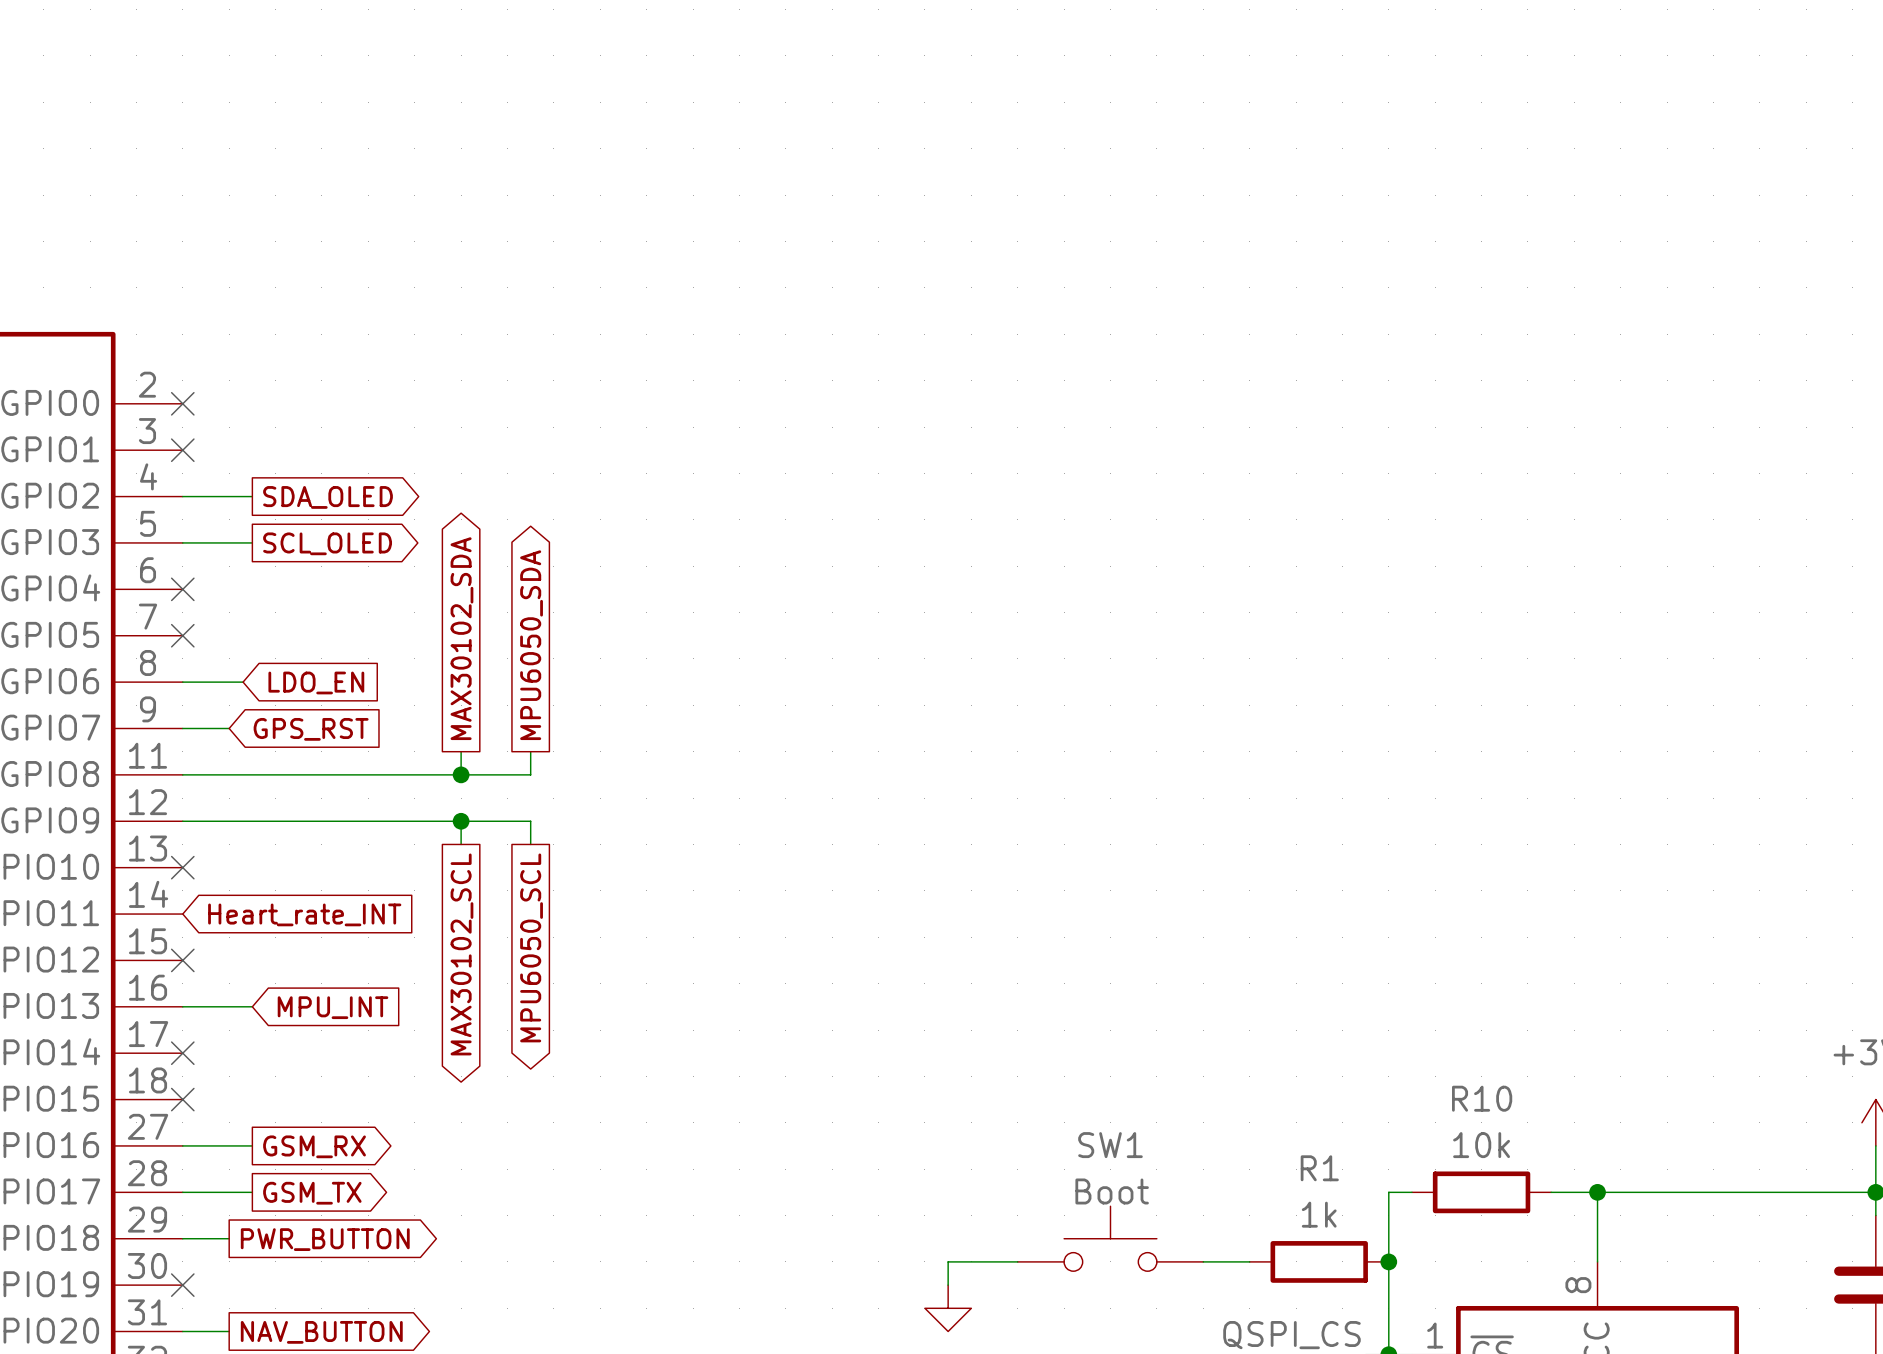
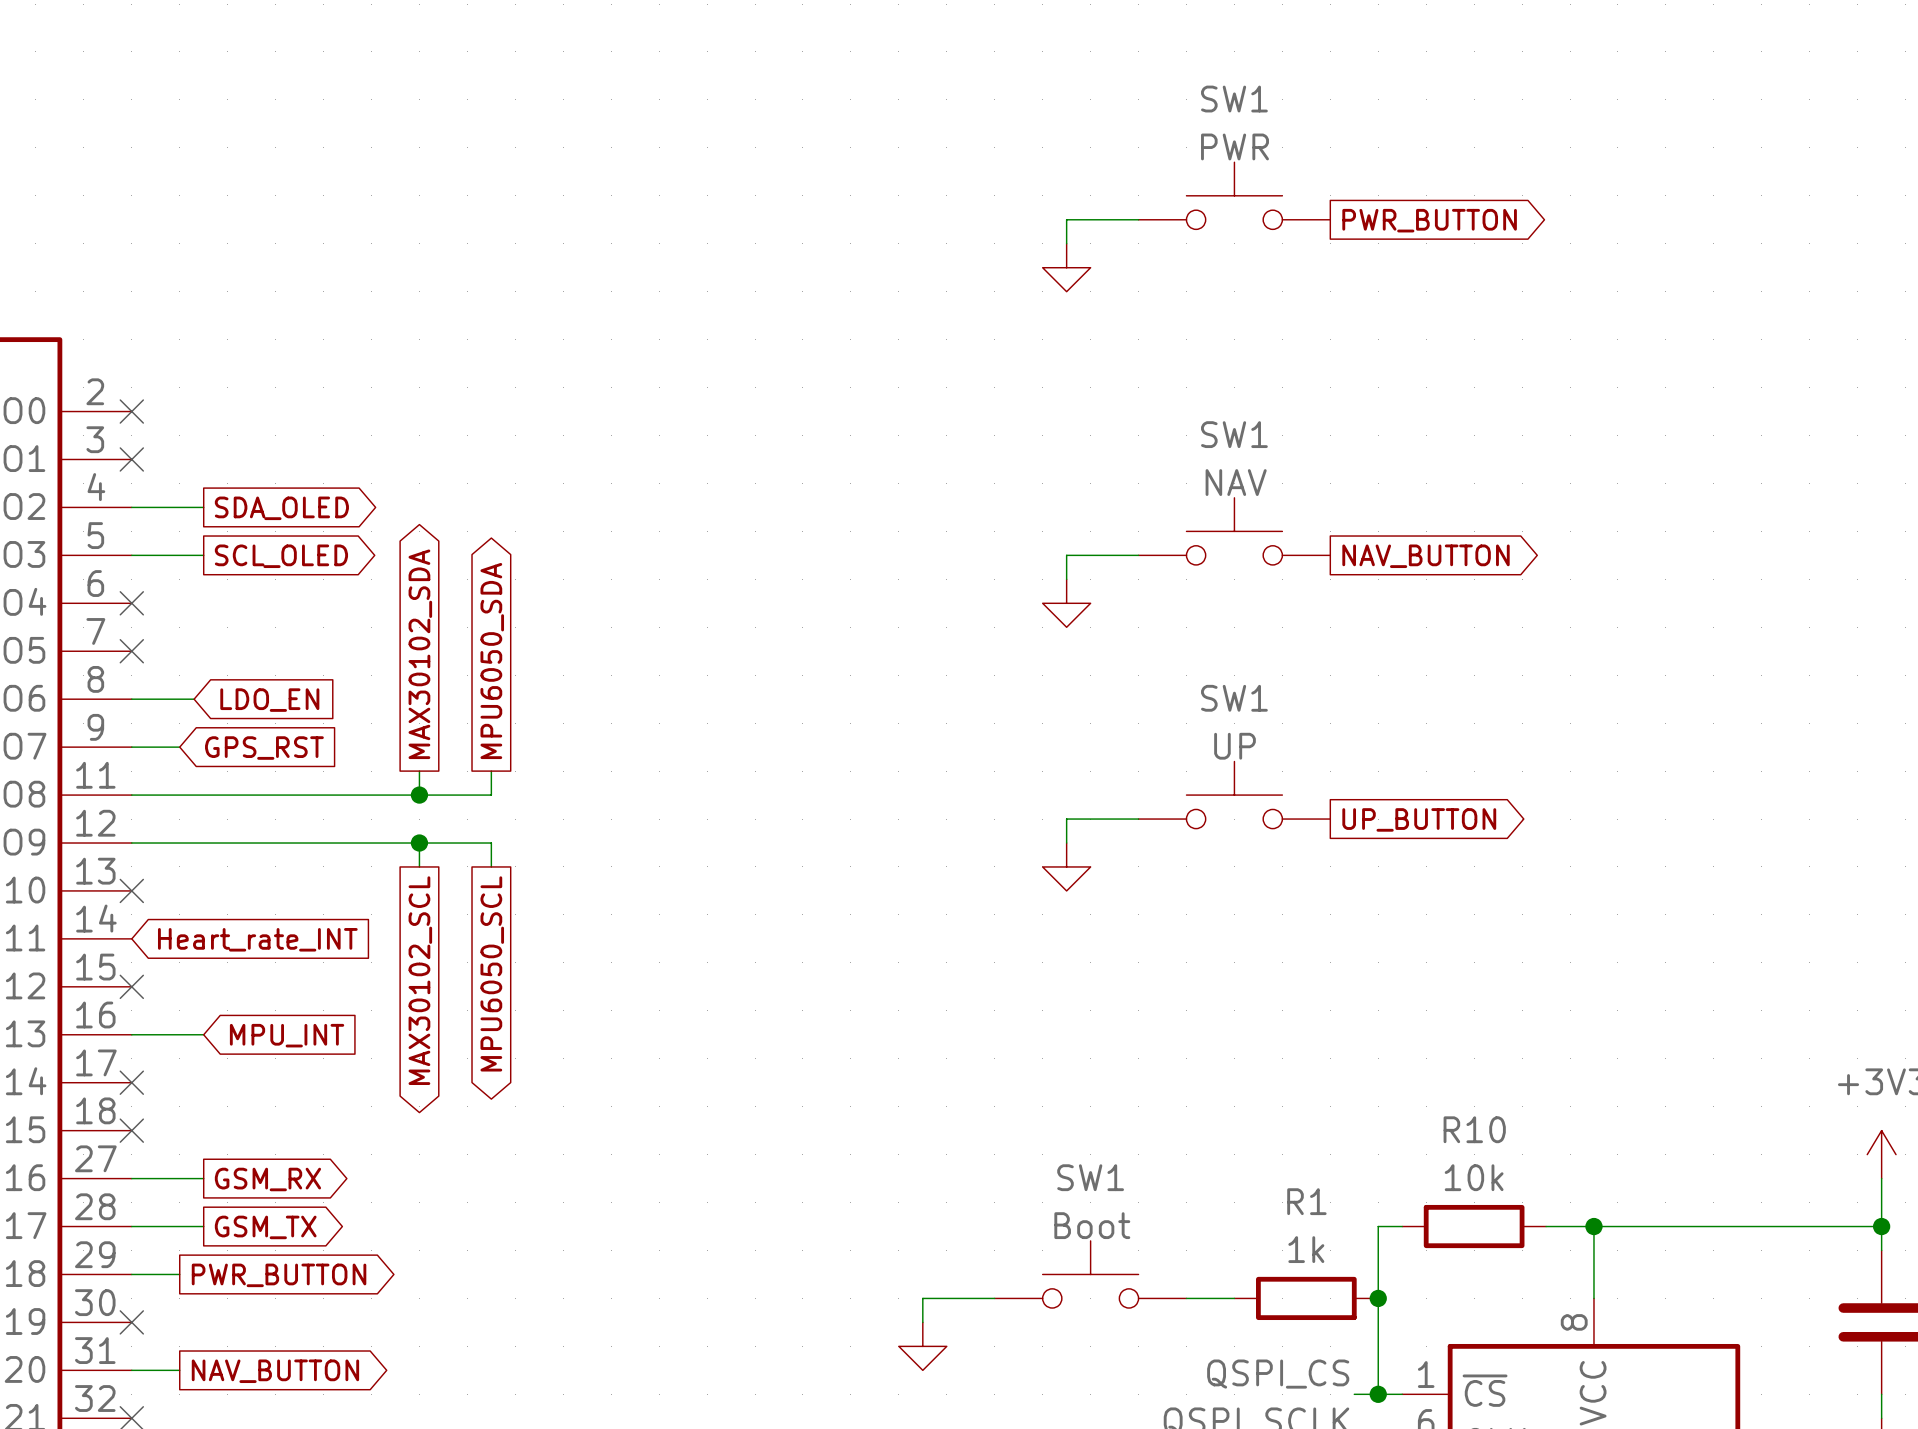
SW1: none -> PWR (1234, 195)
wire: none -> (1138, 219) (1066, 219) (1066, 243)
global label: none -> PWR_BUTTON (1429, 220)
power symbol: none -> (1066, 267)
SW1: none -> NAV (1234, 531)
wire: none -> (1138, 555) (1066, 555) (1066, 579)
global label: none -> NAV_BUTTON (1426, 556)
power symbol: none -> (1066, 603)
SW1: none -> UP (1234, 795)
wire: none -> (1138, 819) (1066, 819) (1066, 843)
global label: none -> UP_BUTTON (1419, 819)
power symbol: none -> (1066, 866)

